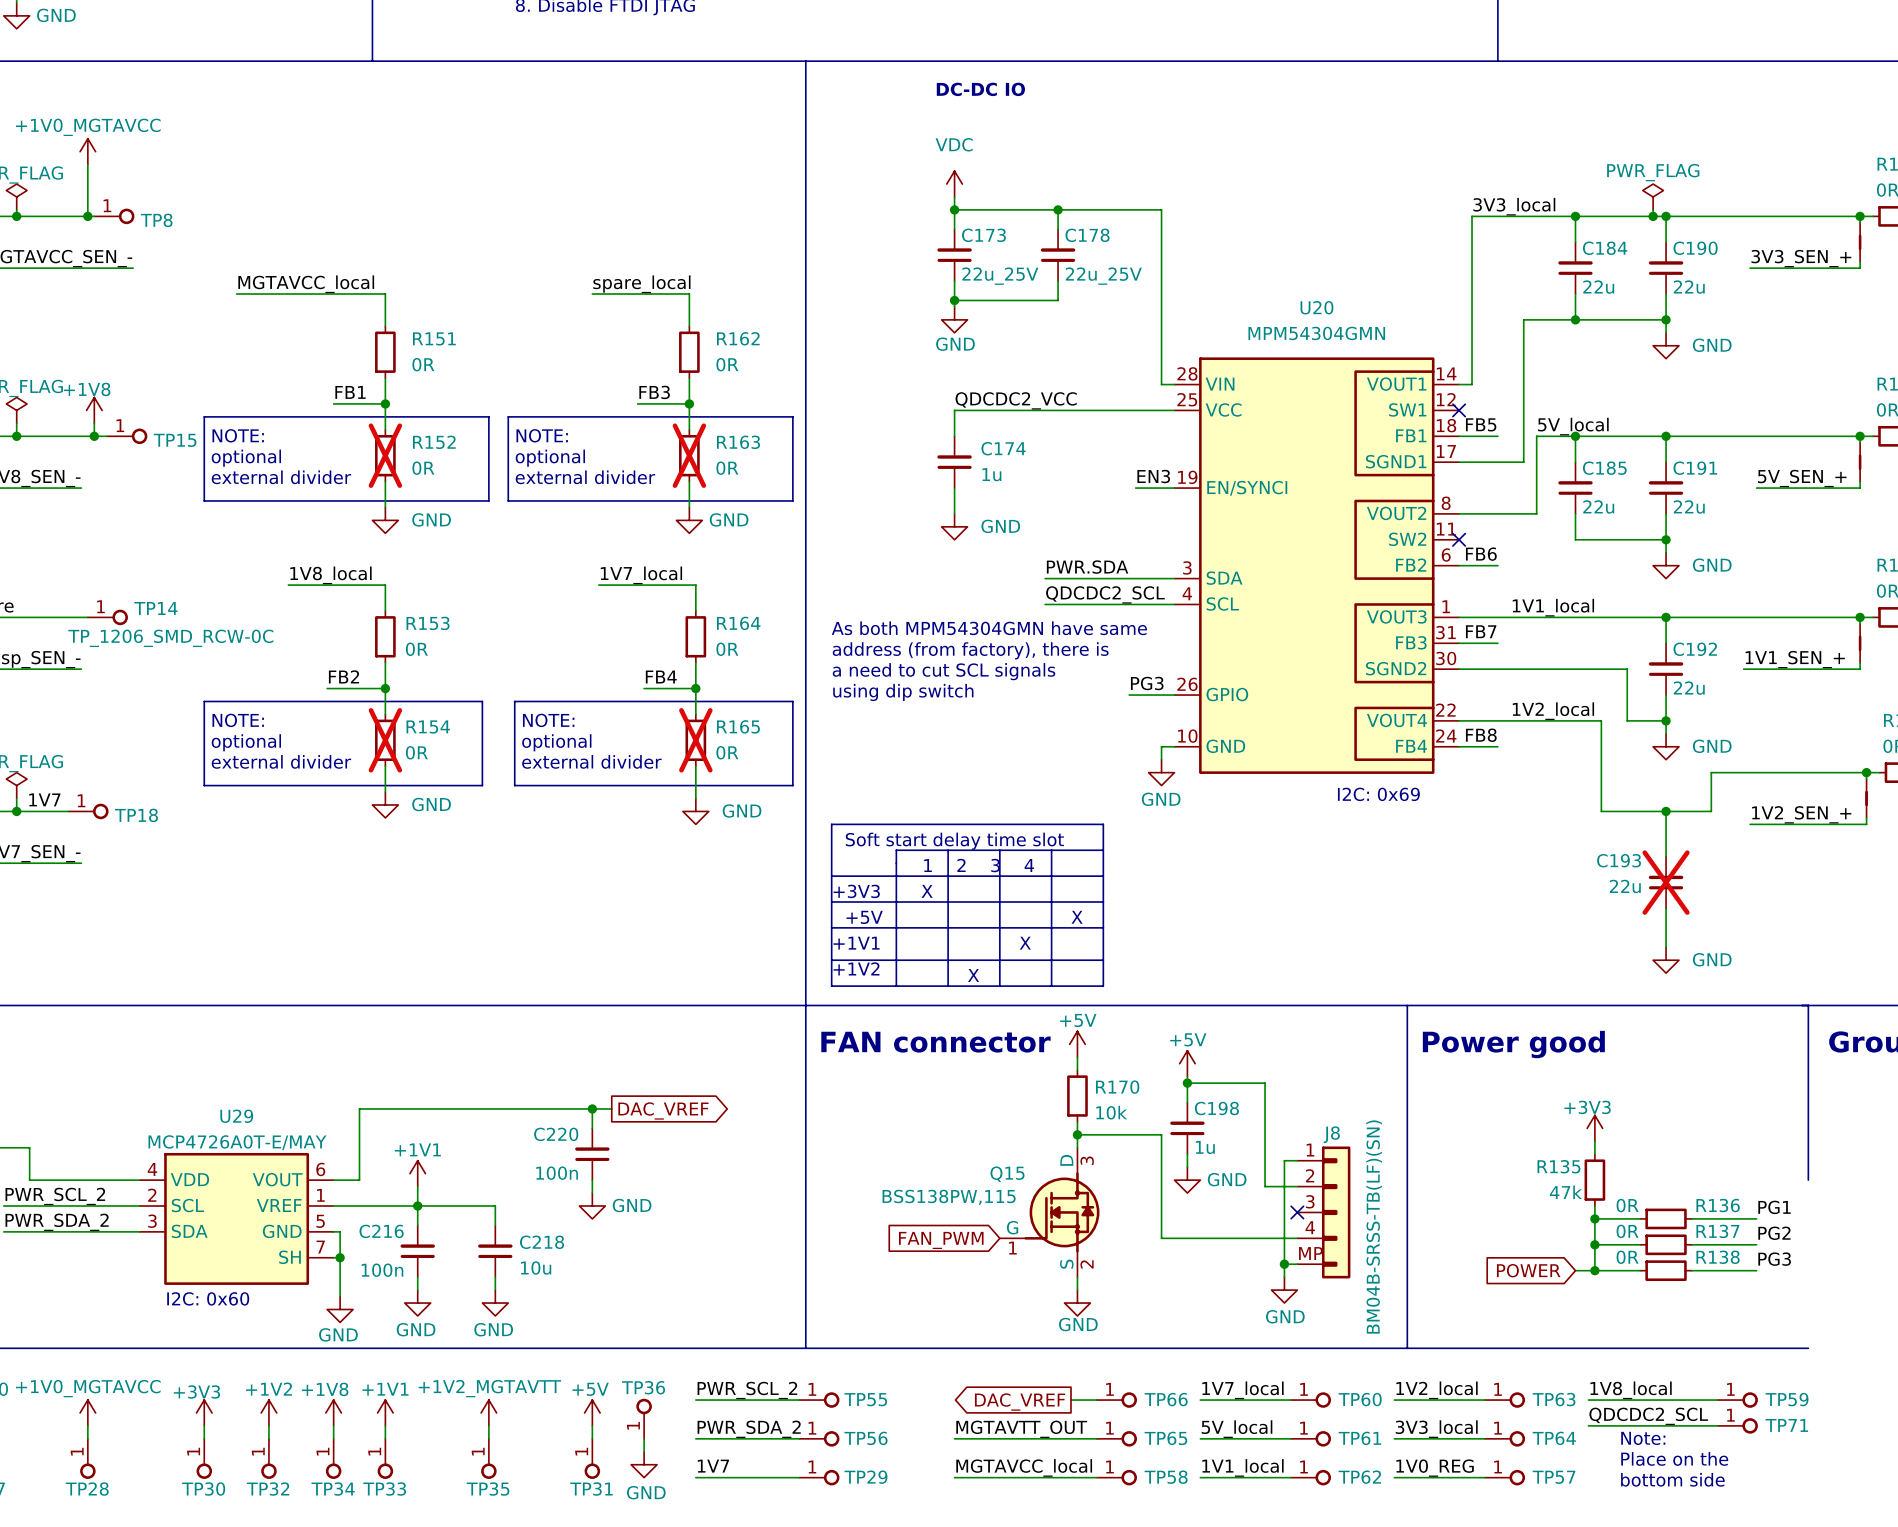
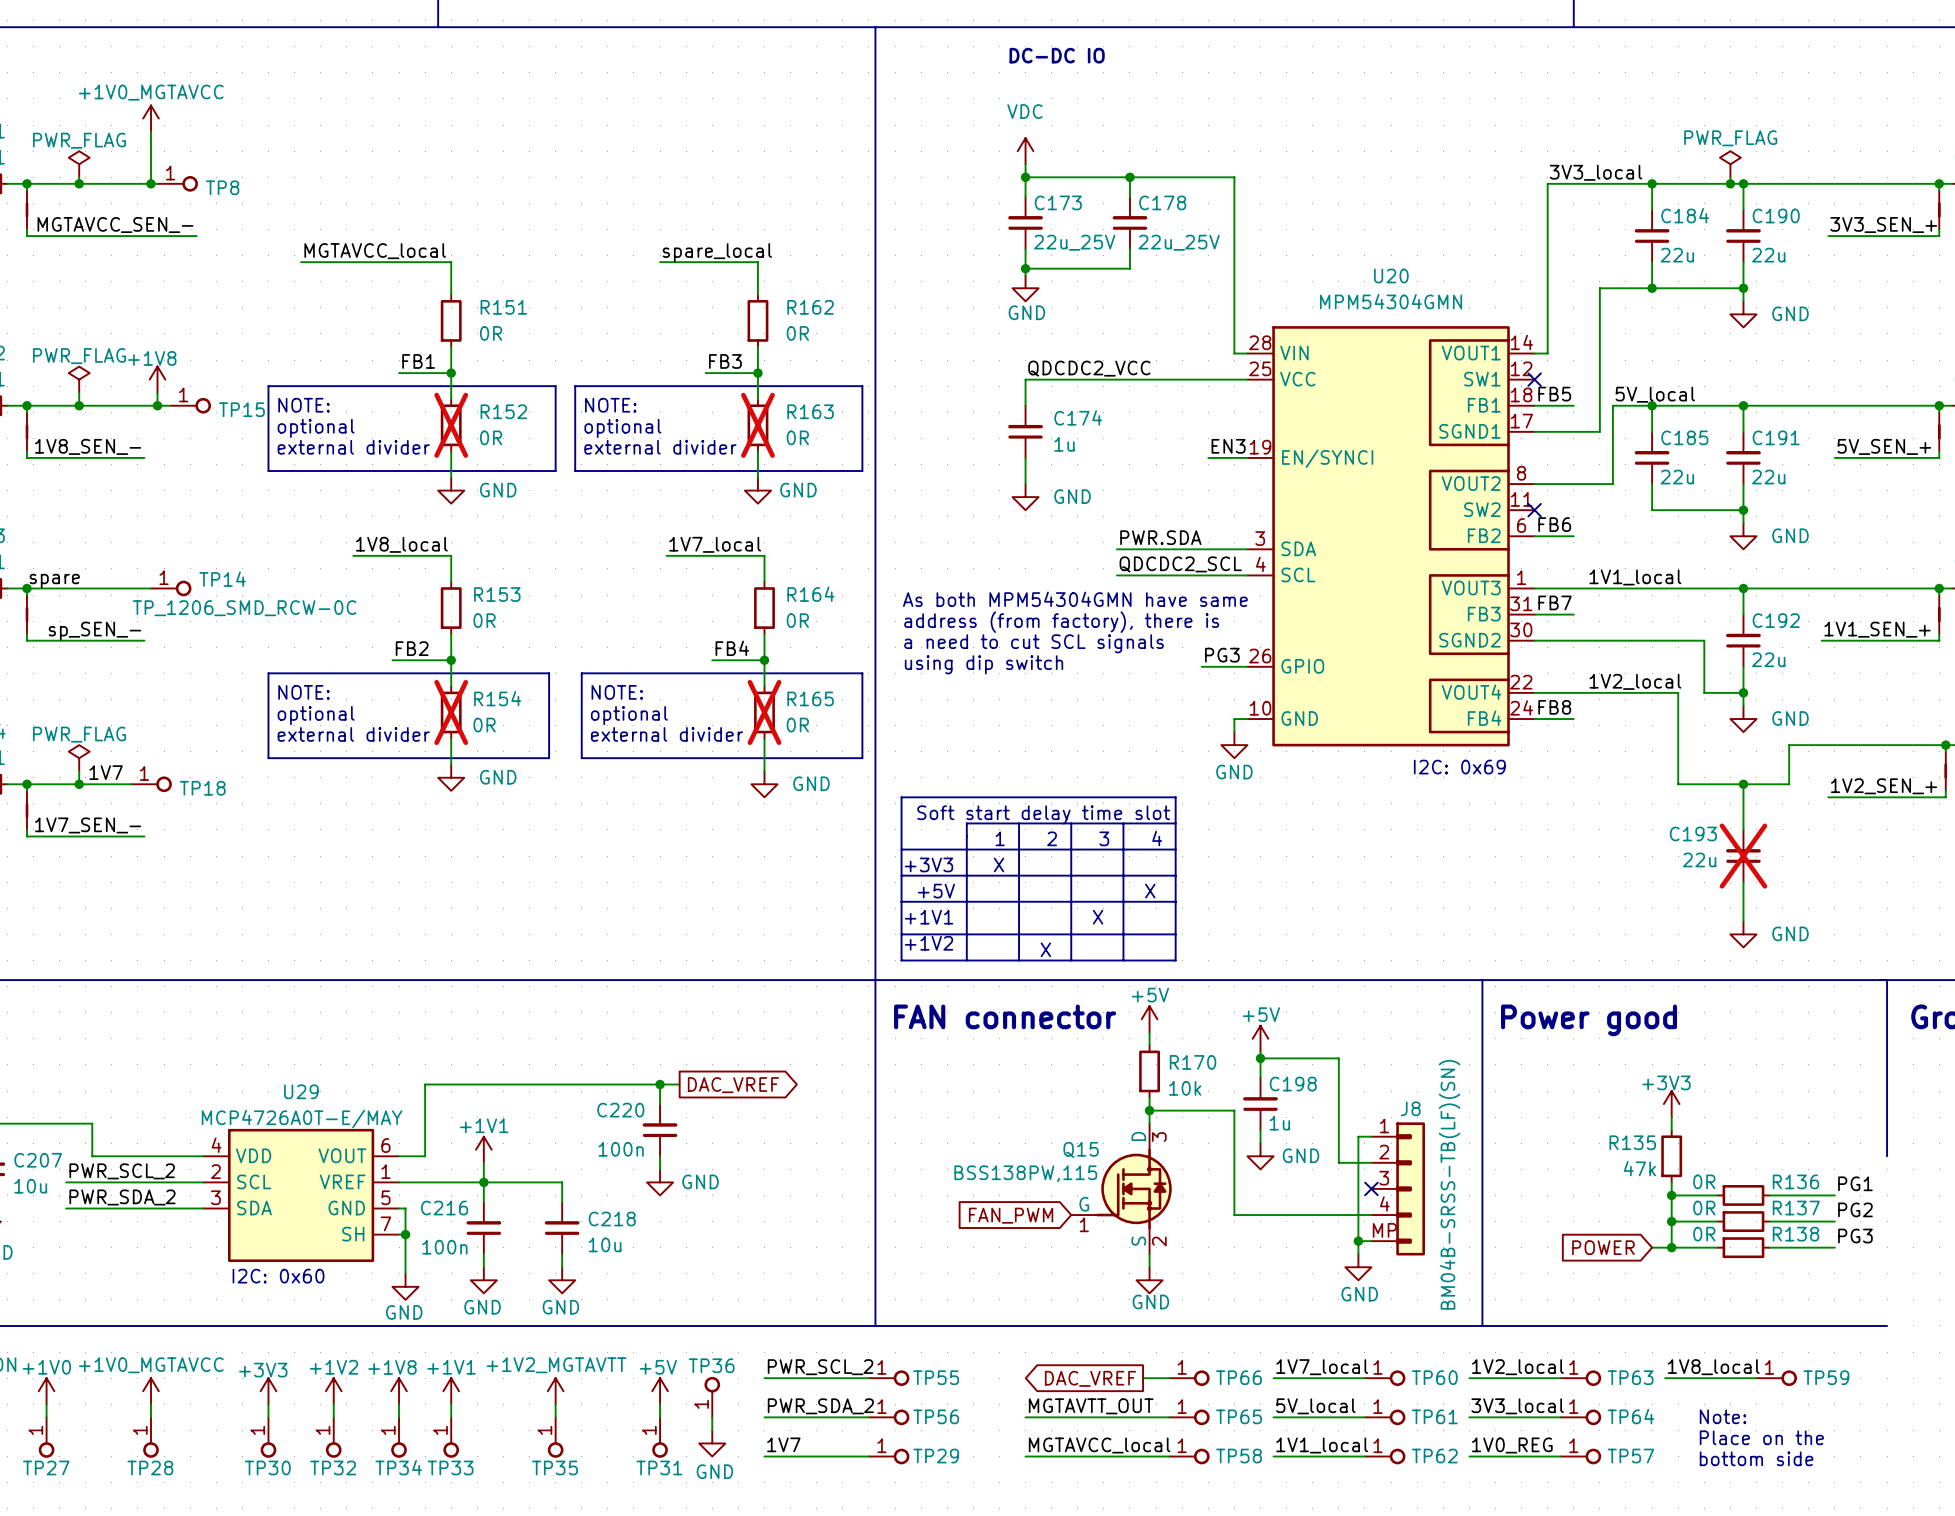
TP59 position: (1737, 1400) -> (1776, 1378)
label: QDCDC2_SCL (1648, 1416) -> none
wire: (1588, 1425) (1717, 1425) -> none
TP71: (1737, 1425) -> none

